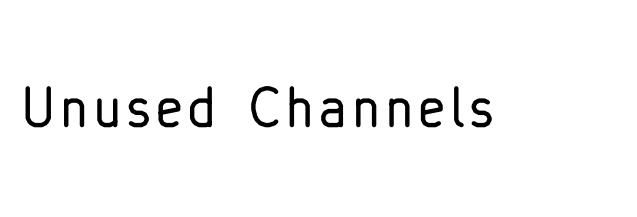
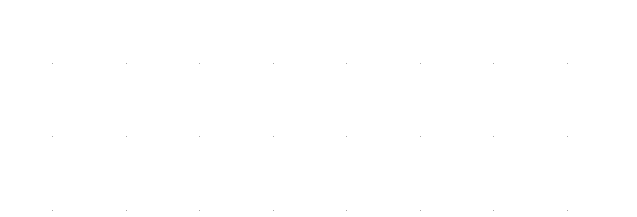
text: Unused Channels (258, 106) -> none

